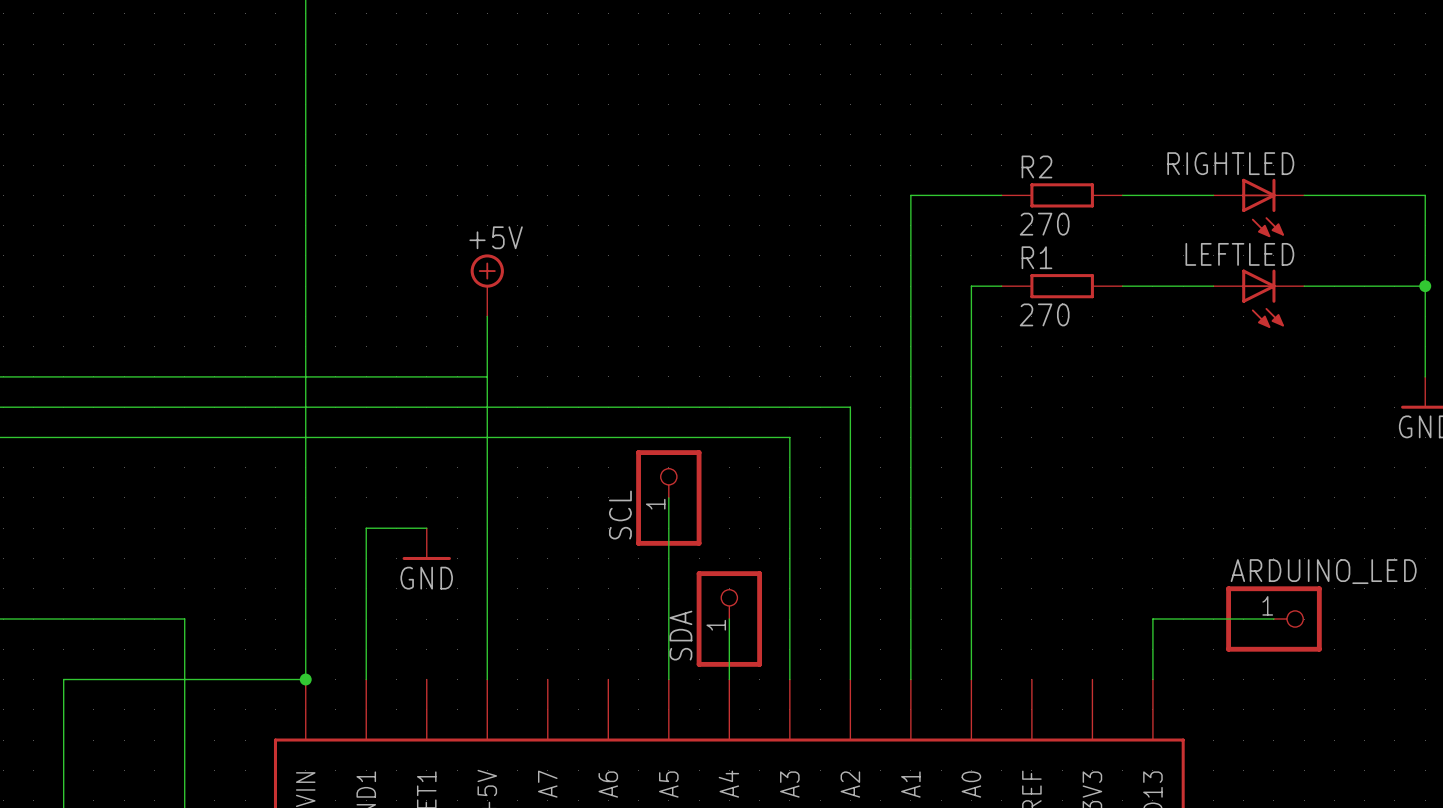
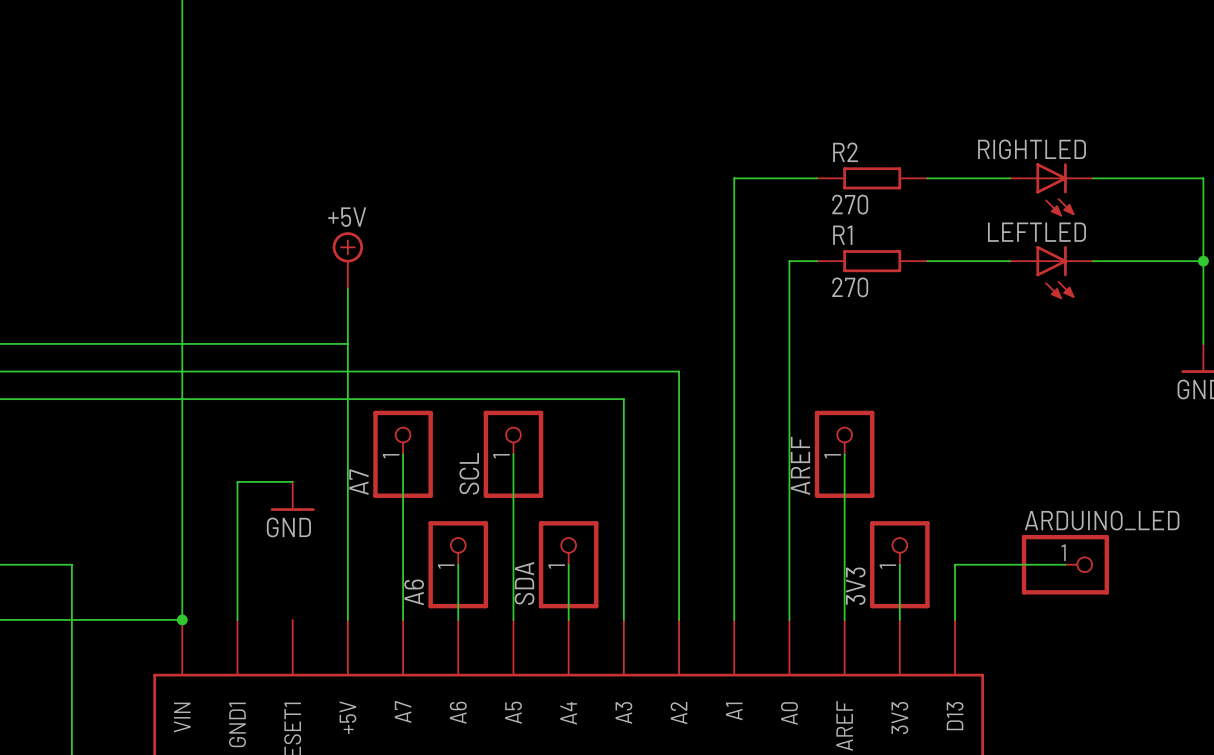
wire: none -> (403, 454) (403, 619)
A7: none -> (403, 454)
wire: none -> (844, 454) (844, 619)
AREF: none -> (844, 454)
wire: none -> (458, 564) (458, 619)
A6: none -> (458, 564)
wire: none -> (899, 564) (899, 619)
3V3: none -> (899, 564)

